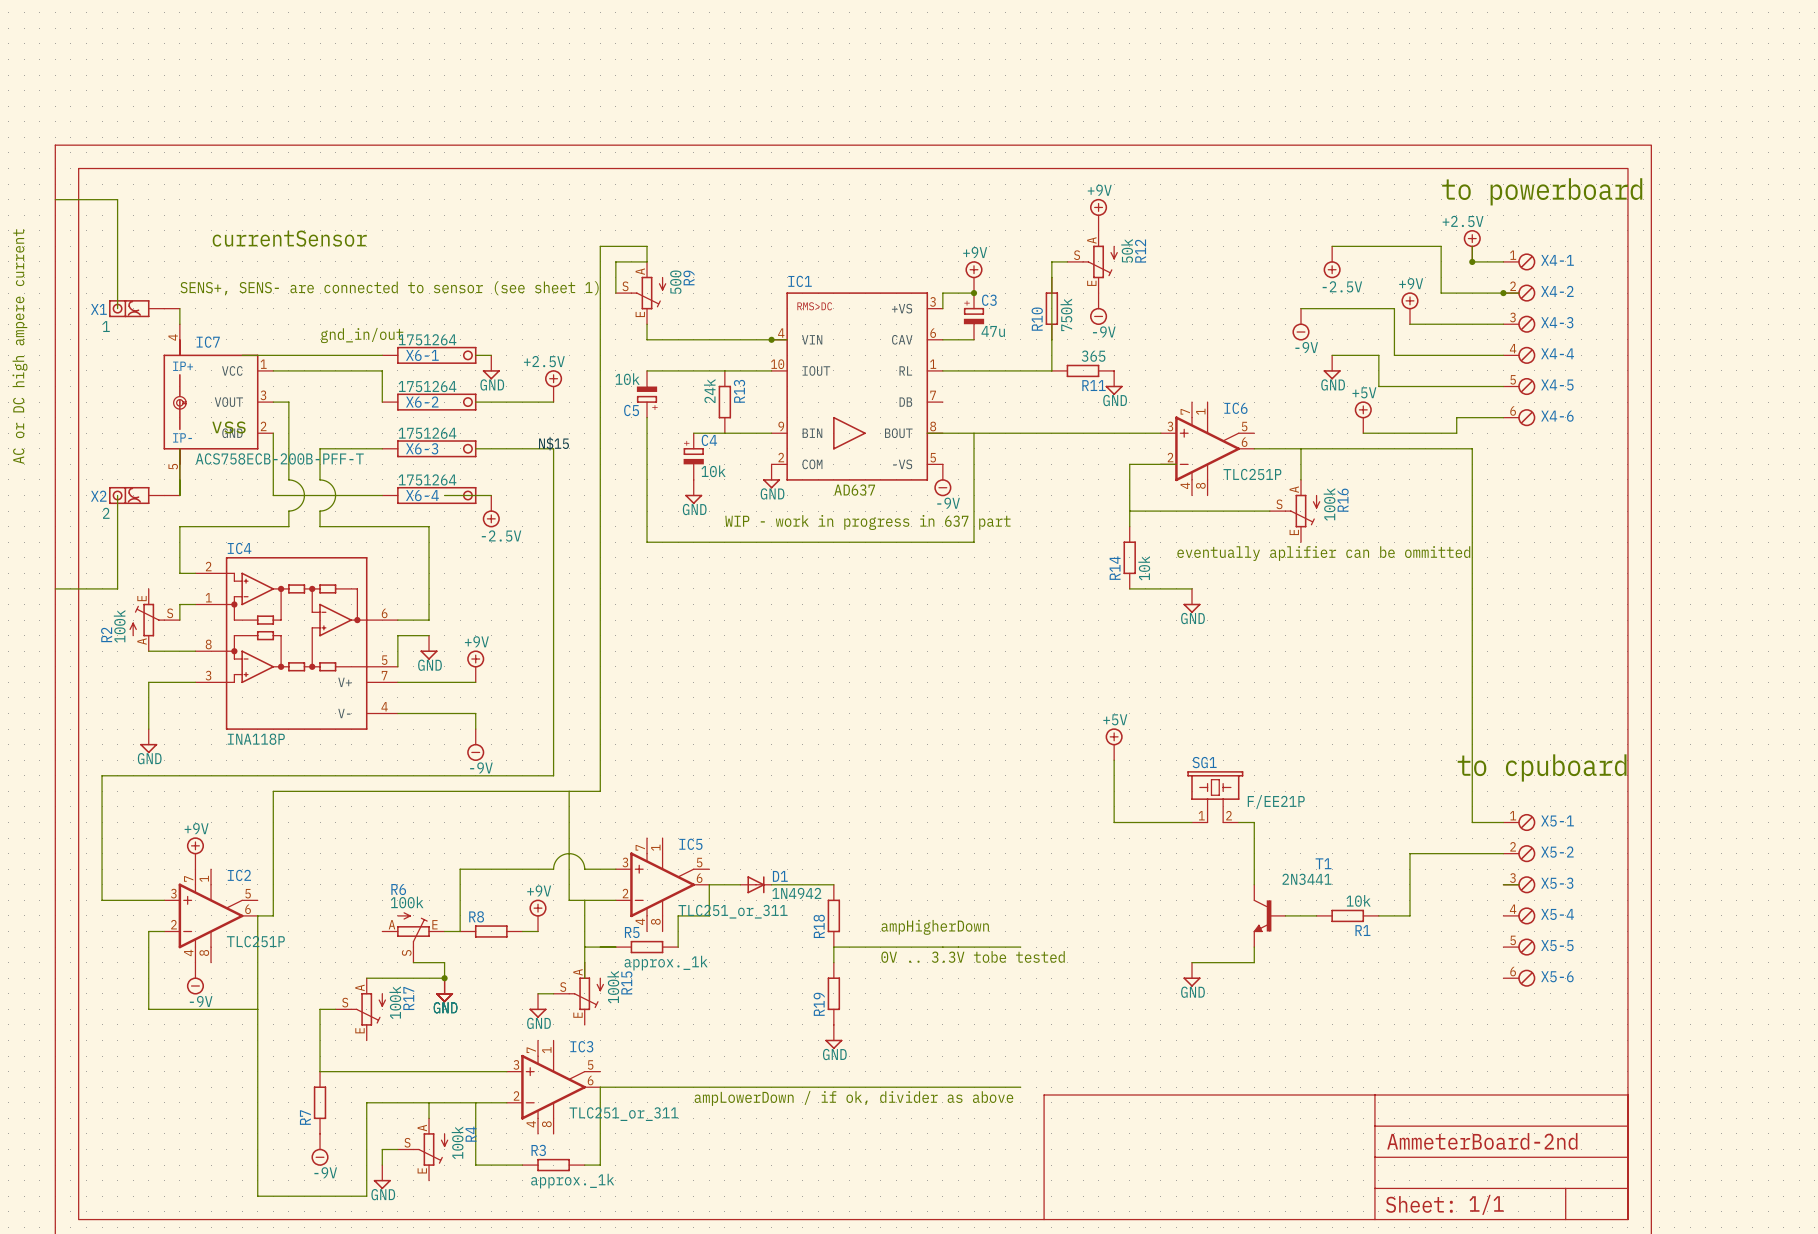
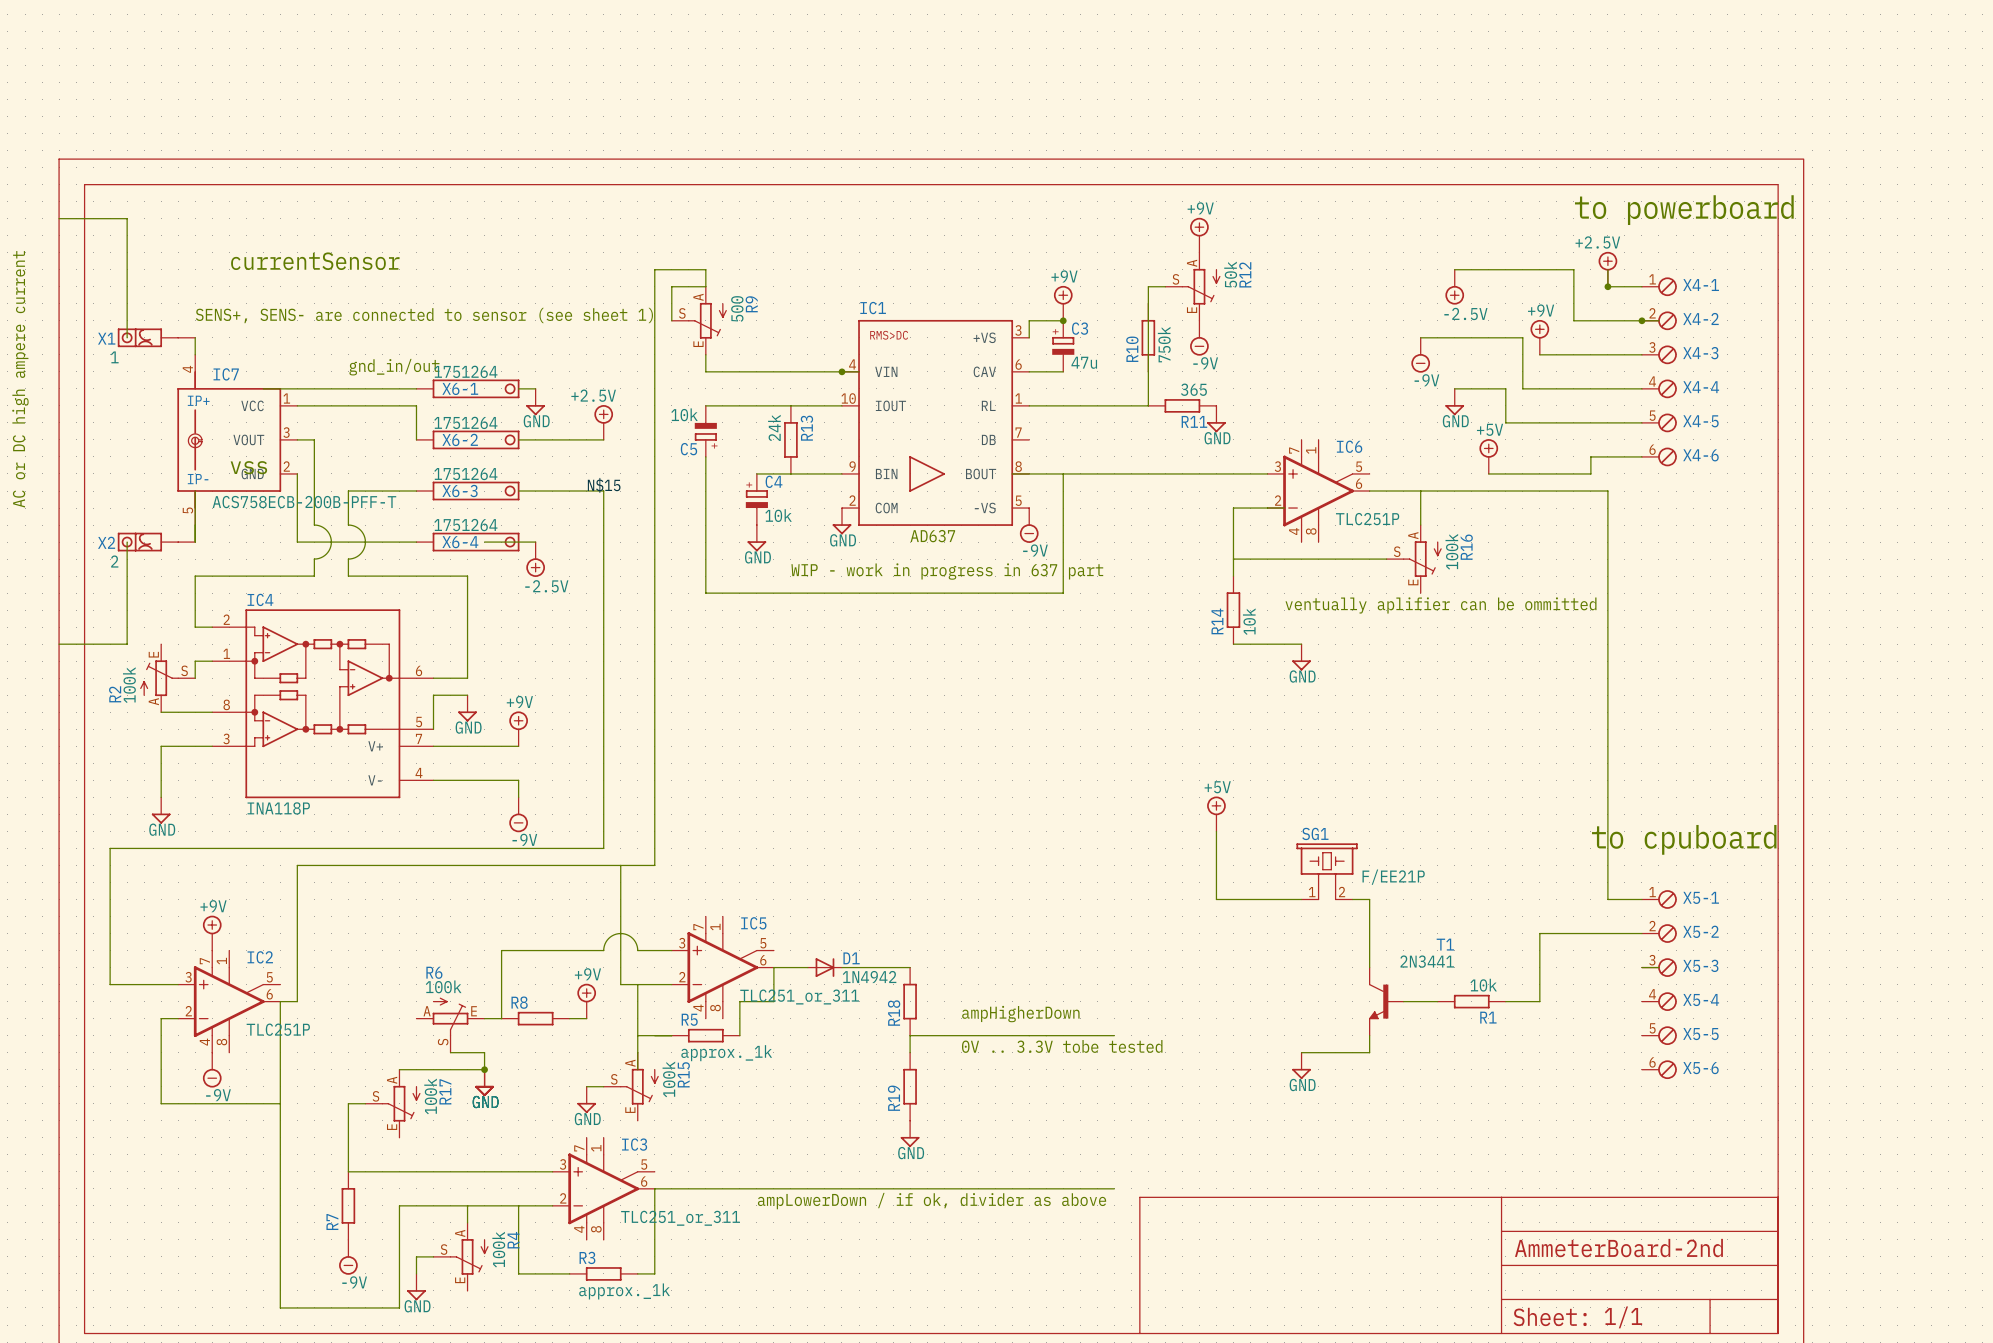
text: eventually aplifier can be ommitted (1323, 553) -> ventually aplifier can be ommitted (1440, 605)

